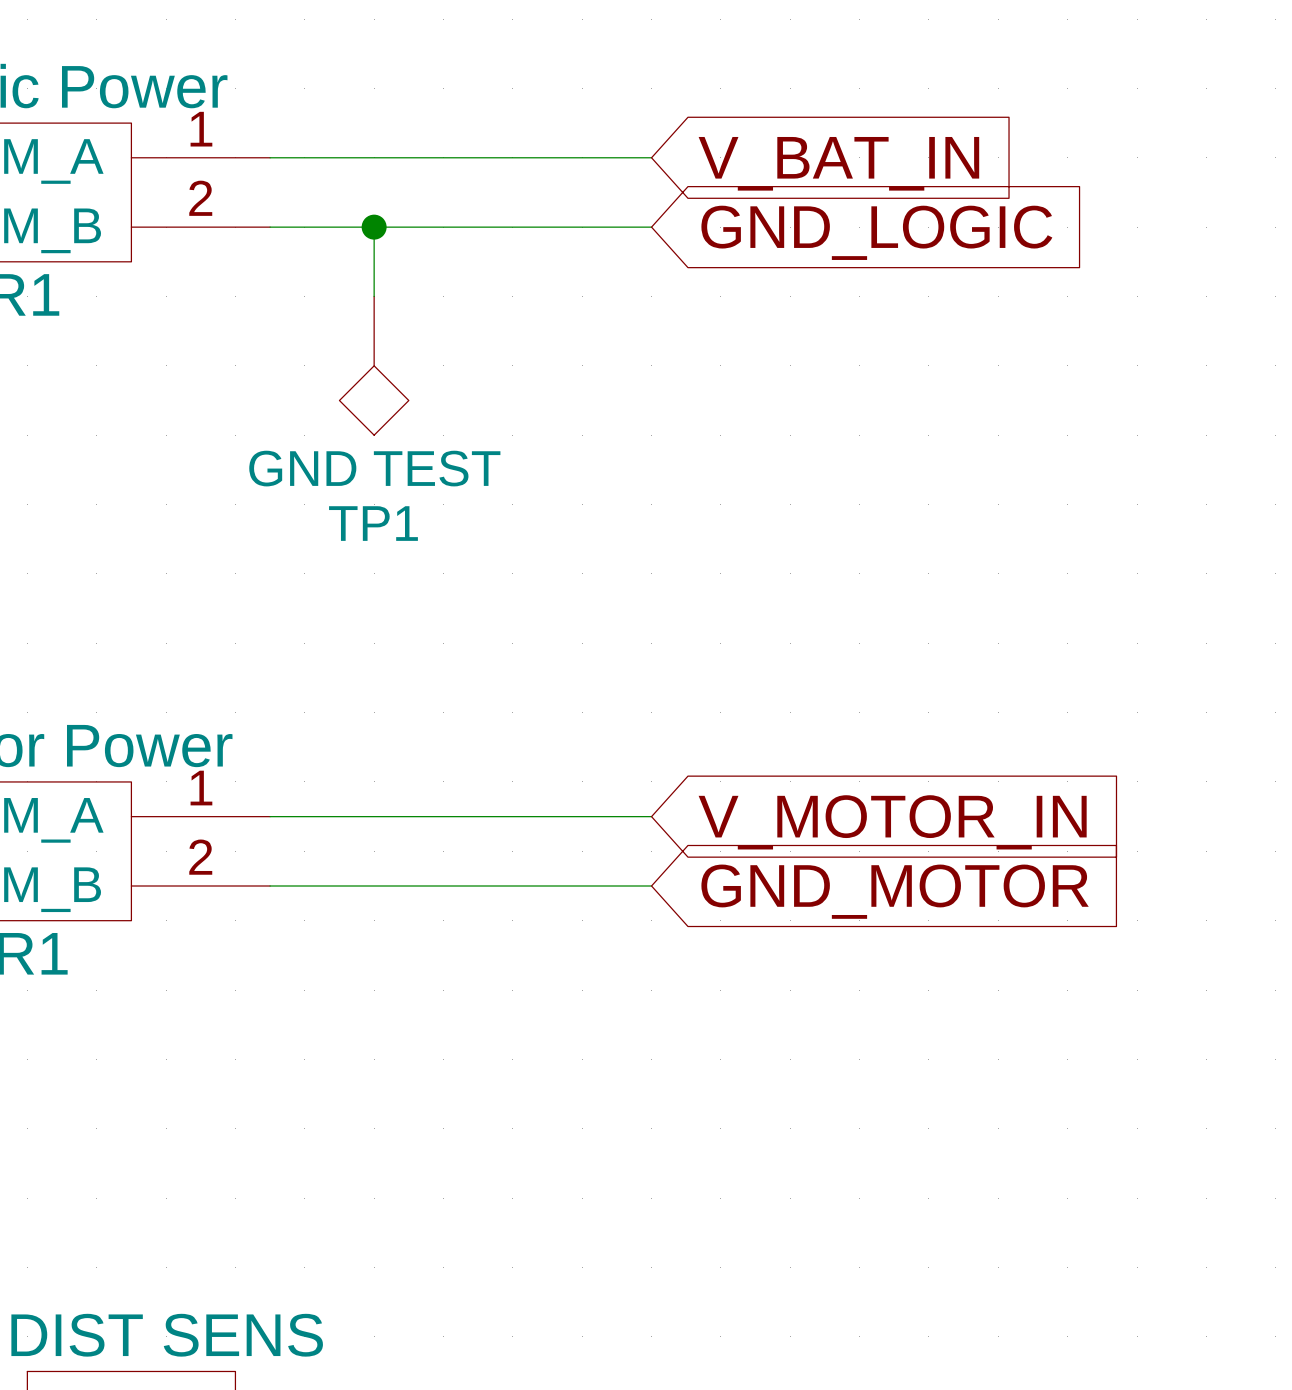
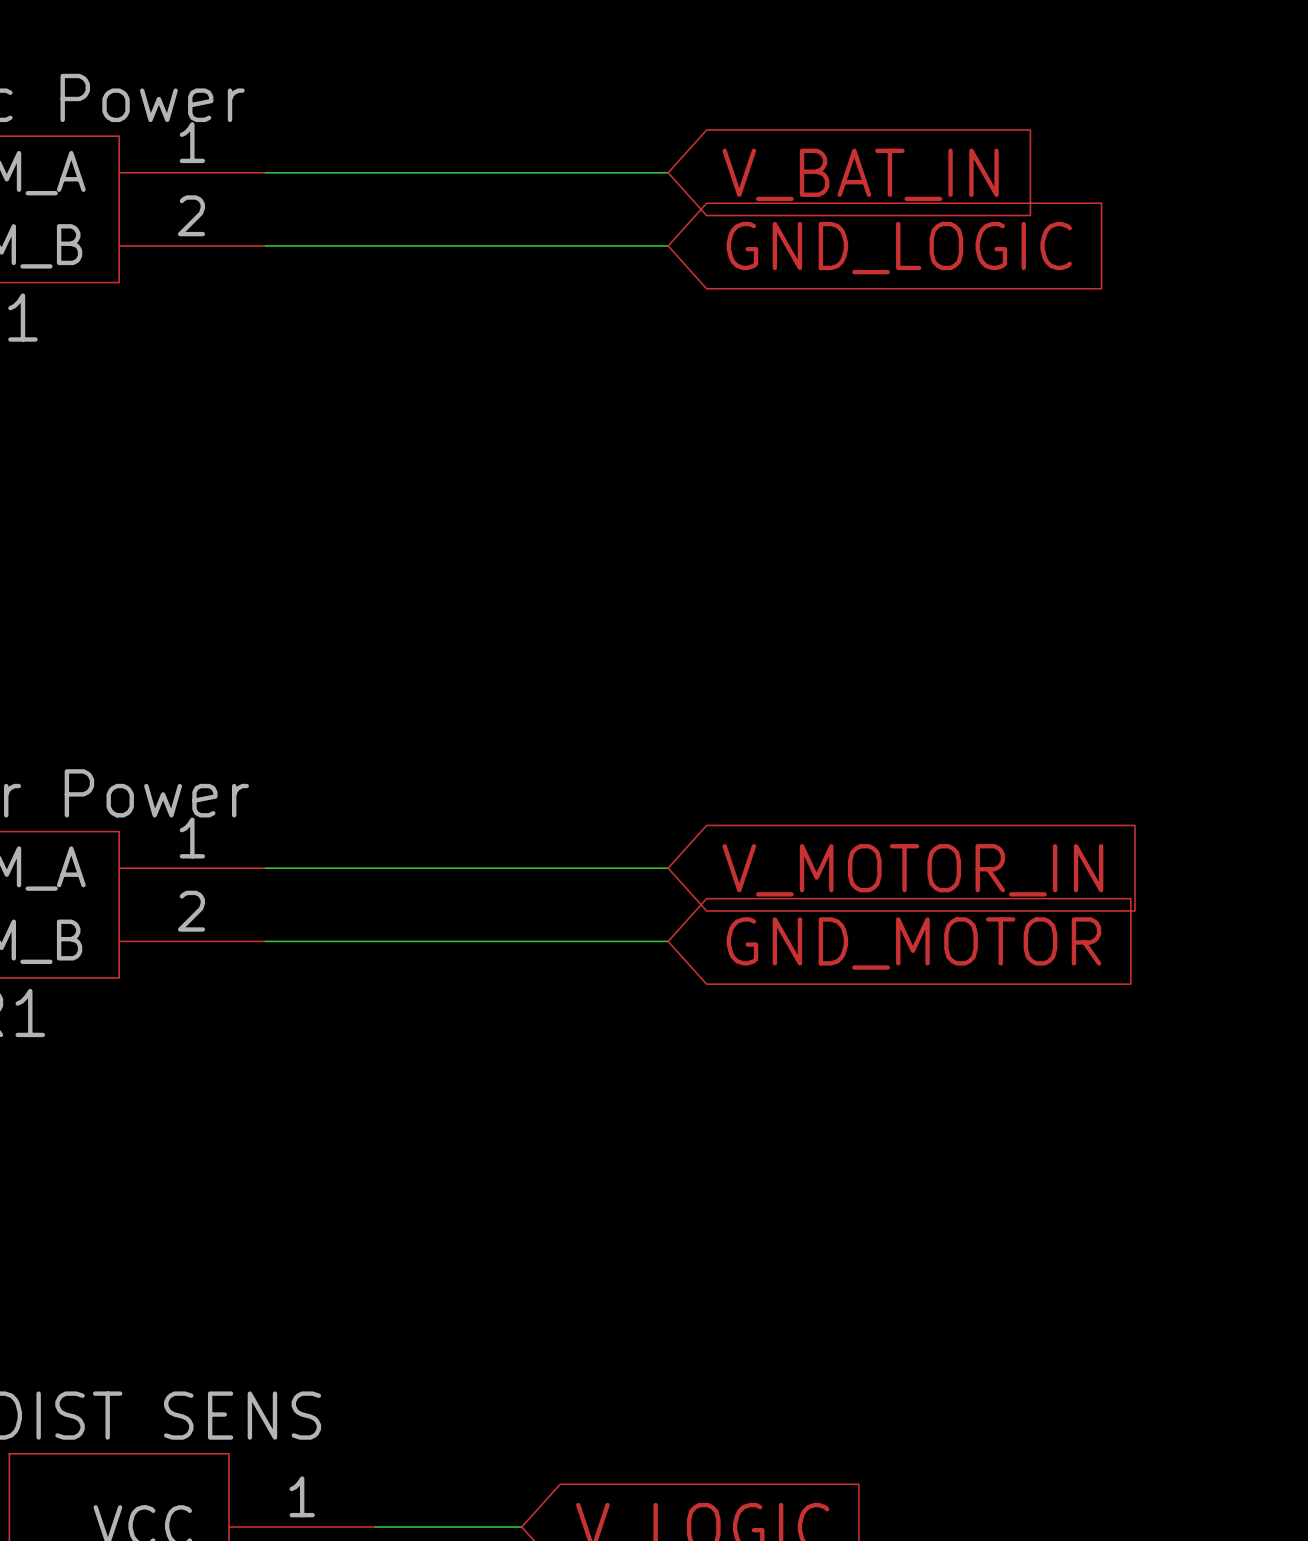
wire: (374, 227) (374, 296) -> none
junction: (374, 227) -> none
TP1: GND TEST (374, 365) -> none

